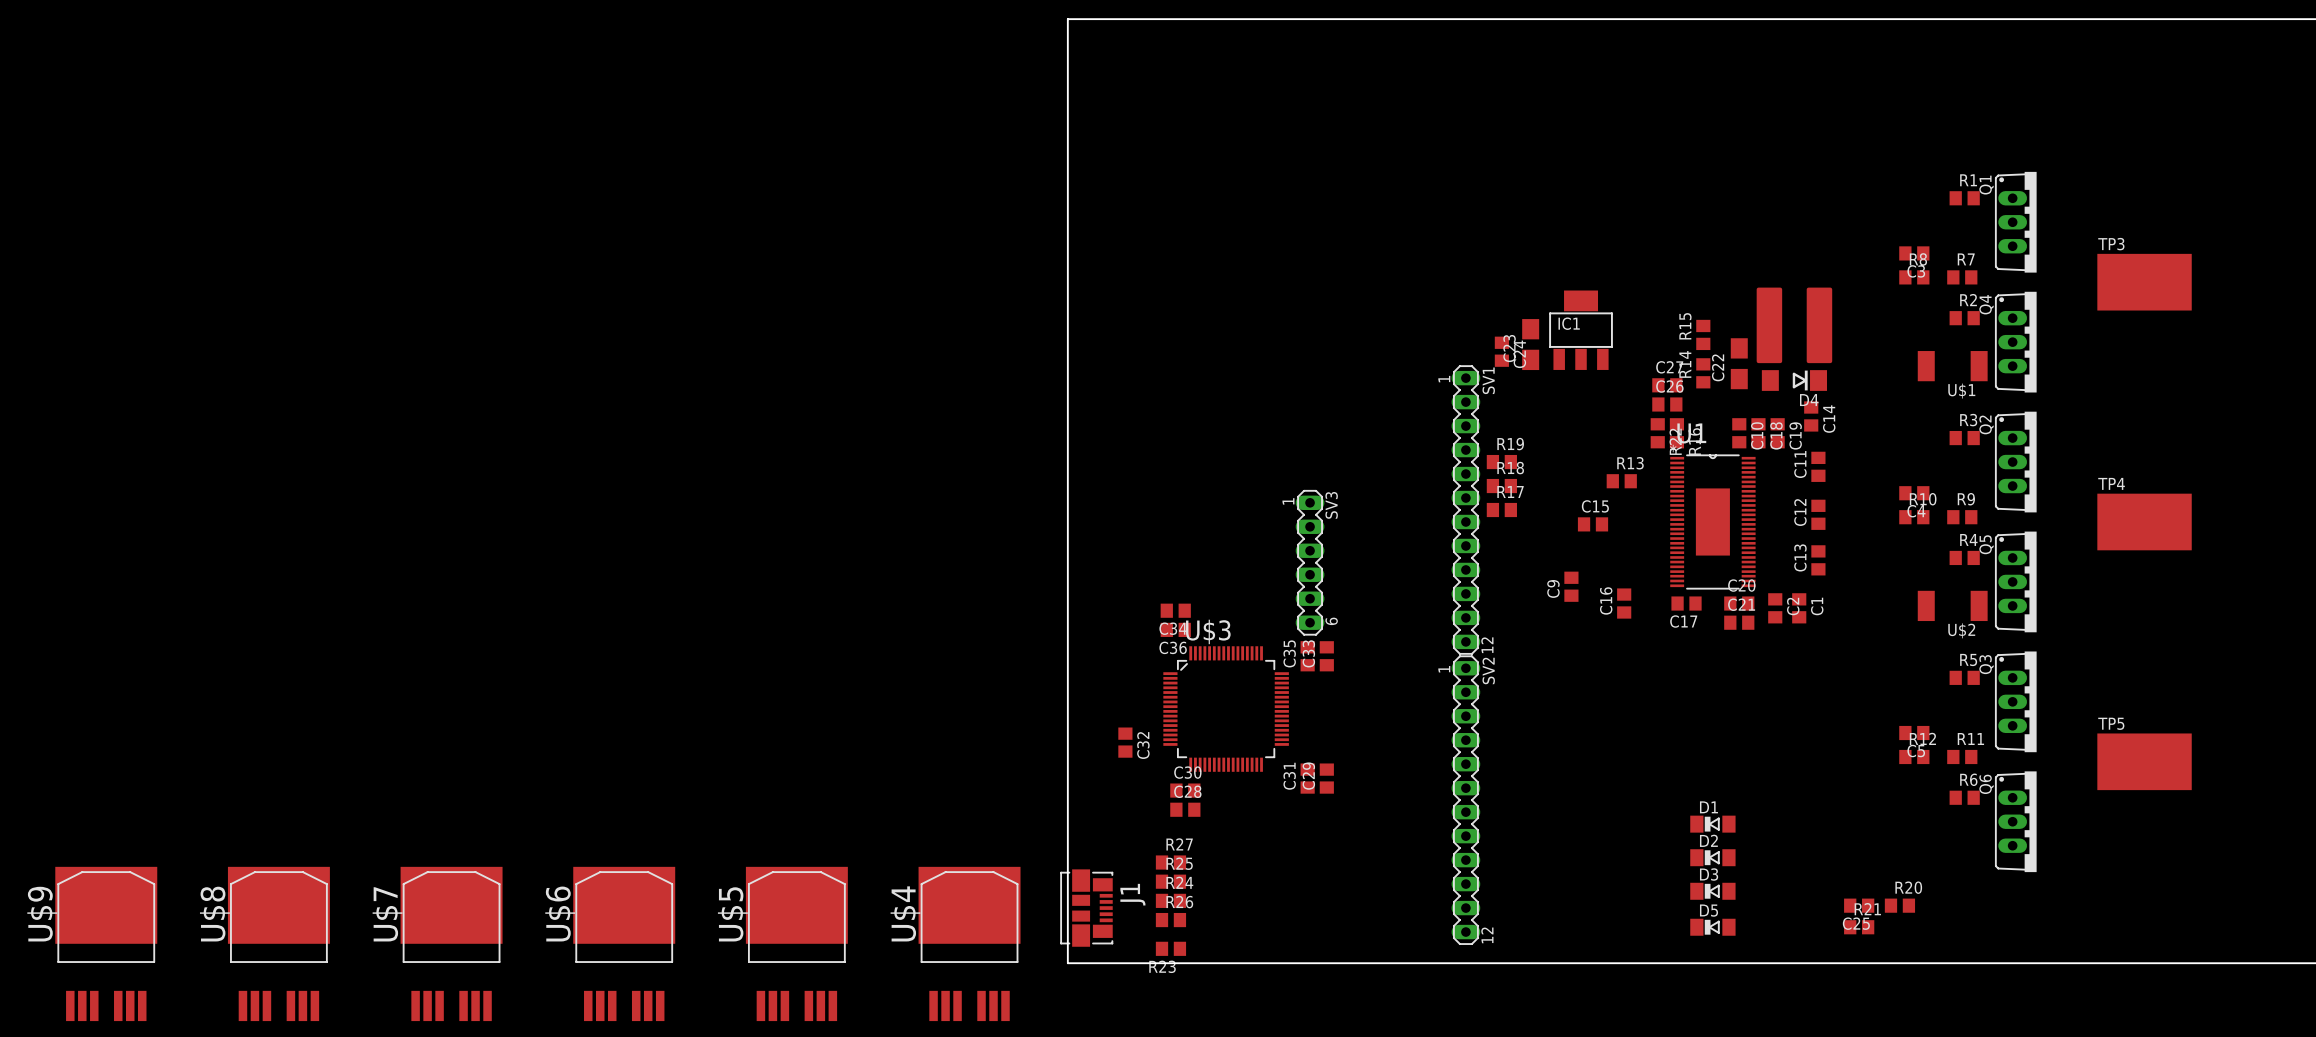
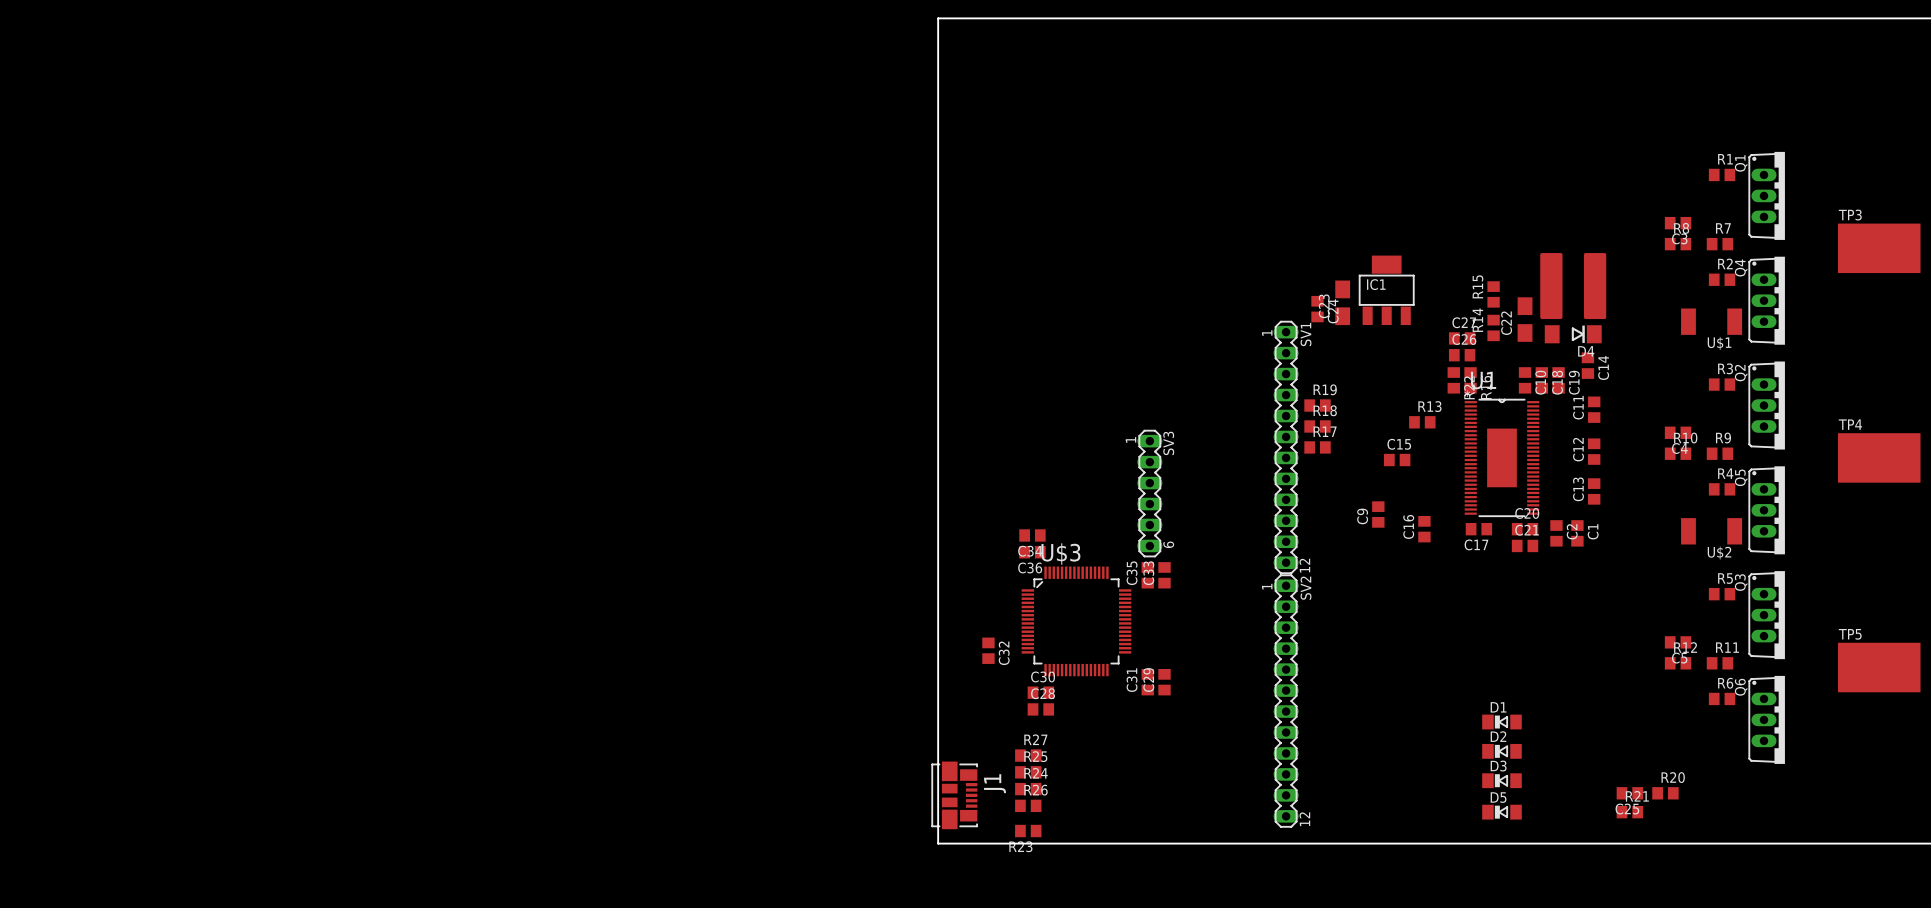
U$9: (106, 943) -> none
U$8: (278, 943) -> none
U$7: (451, 943) -> none
U$6: (624, 943) -> none
U$5: (796, 943) -> none
U$4: (969, 943) -> none

